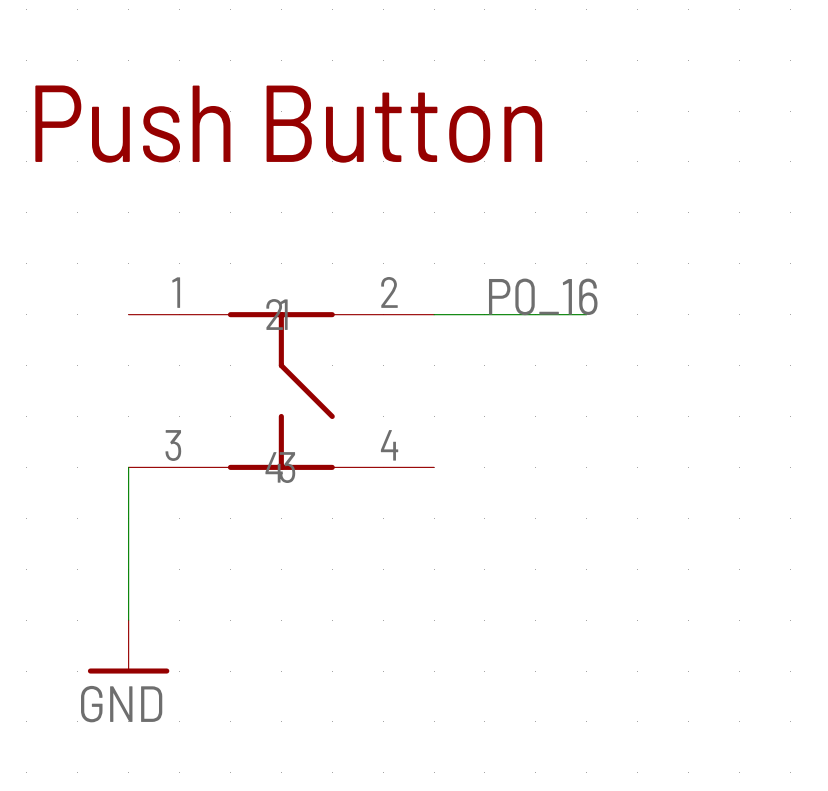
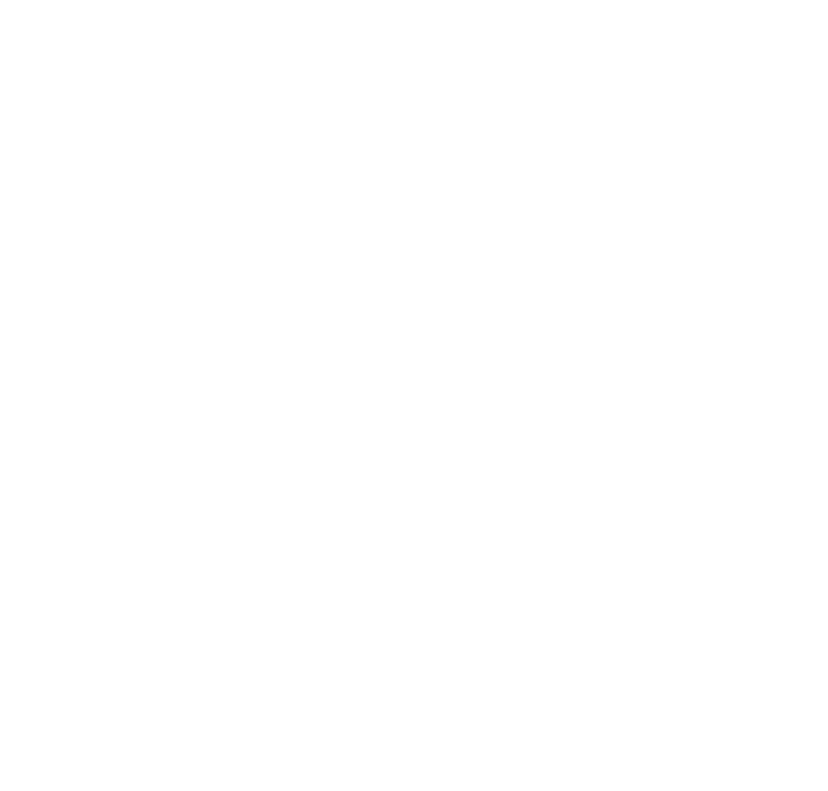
text: Push Button (288, 124) -> none
label: P0_16 (543, 296) -> none
wire: (434, 314) (586, 314) -> none
part: (281, 391) -> none
wire: (128, 467) (128, 620) -> none
power symbol: GND (128, 646) -> none

